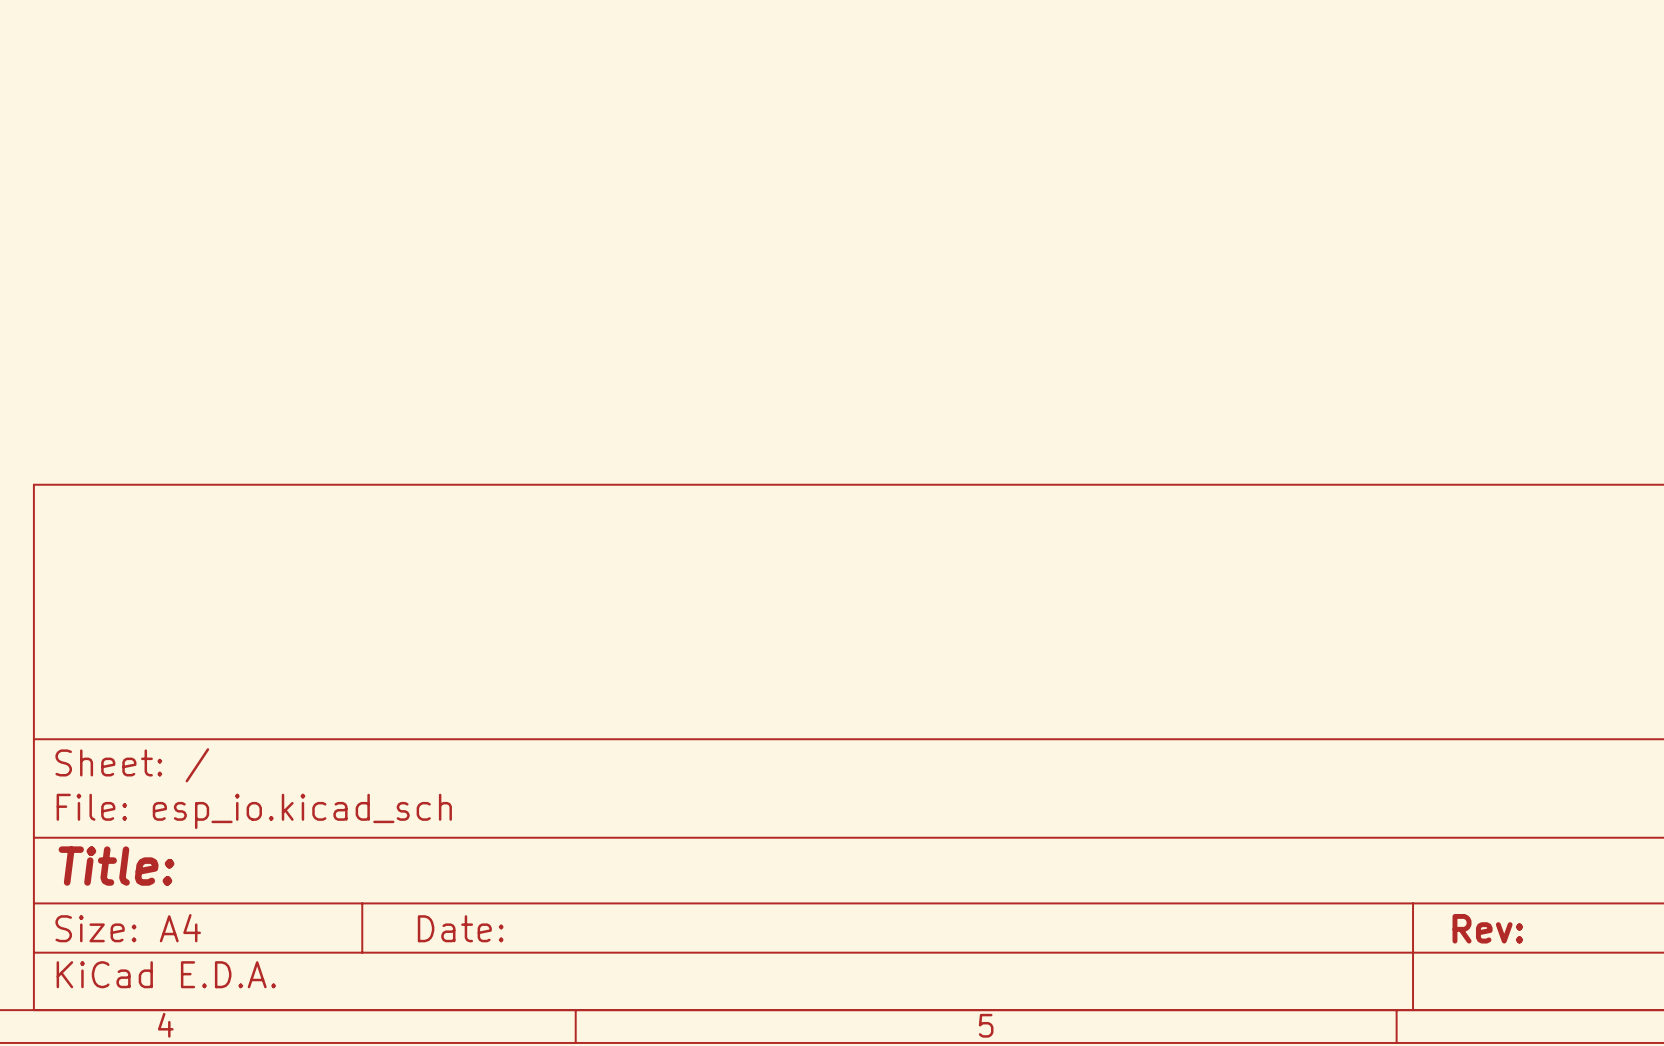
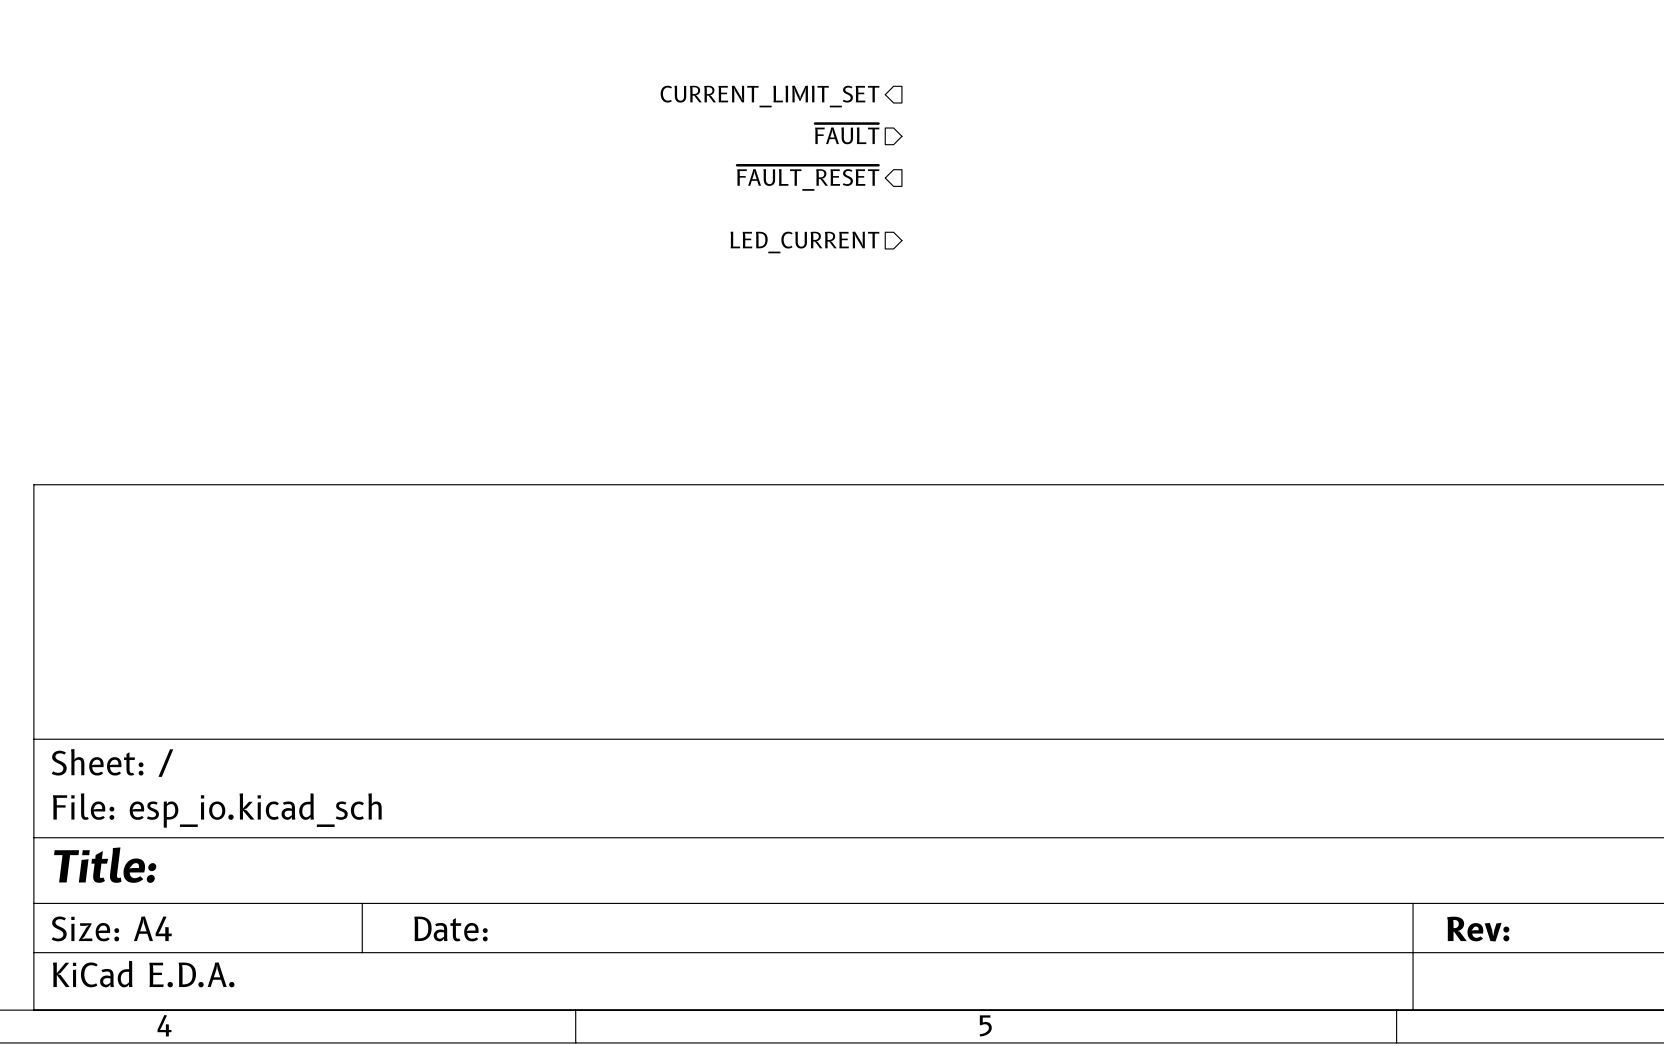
hierarchical label: none -> CURRENT_LIMIT_SET (769, 96)
hierarchical label: none -> ~{FAULT} (847, 133)
hierarchical label: none -> ~{FAULT_RESET} (808, 178)
hierarchical label: none -> LED_CURRENT (804, 242)

